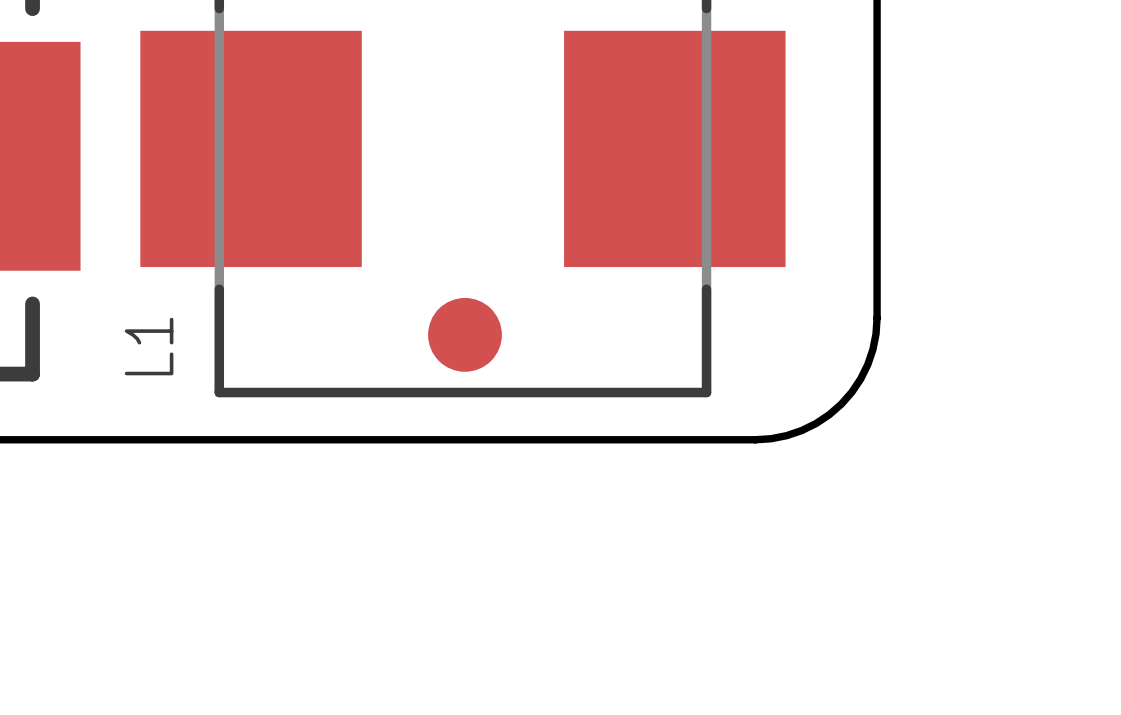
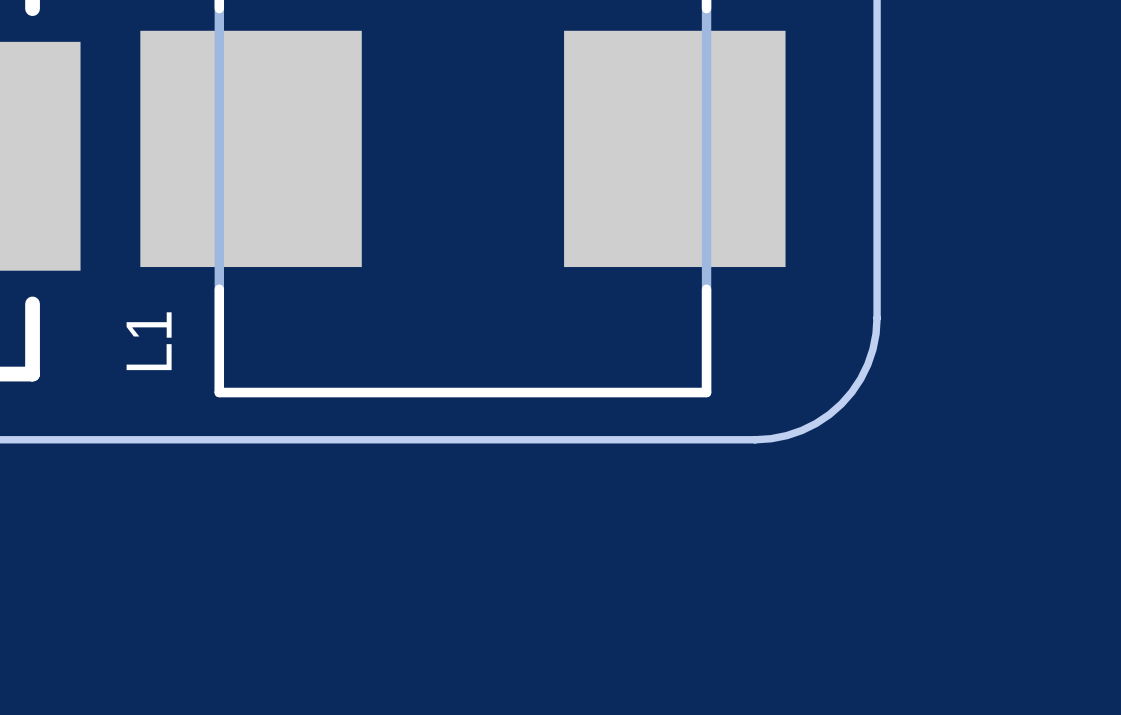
part: (464, 334) -> none

